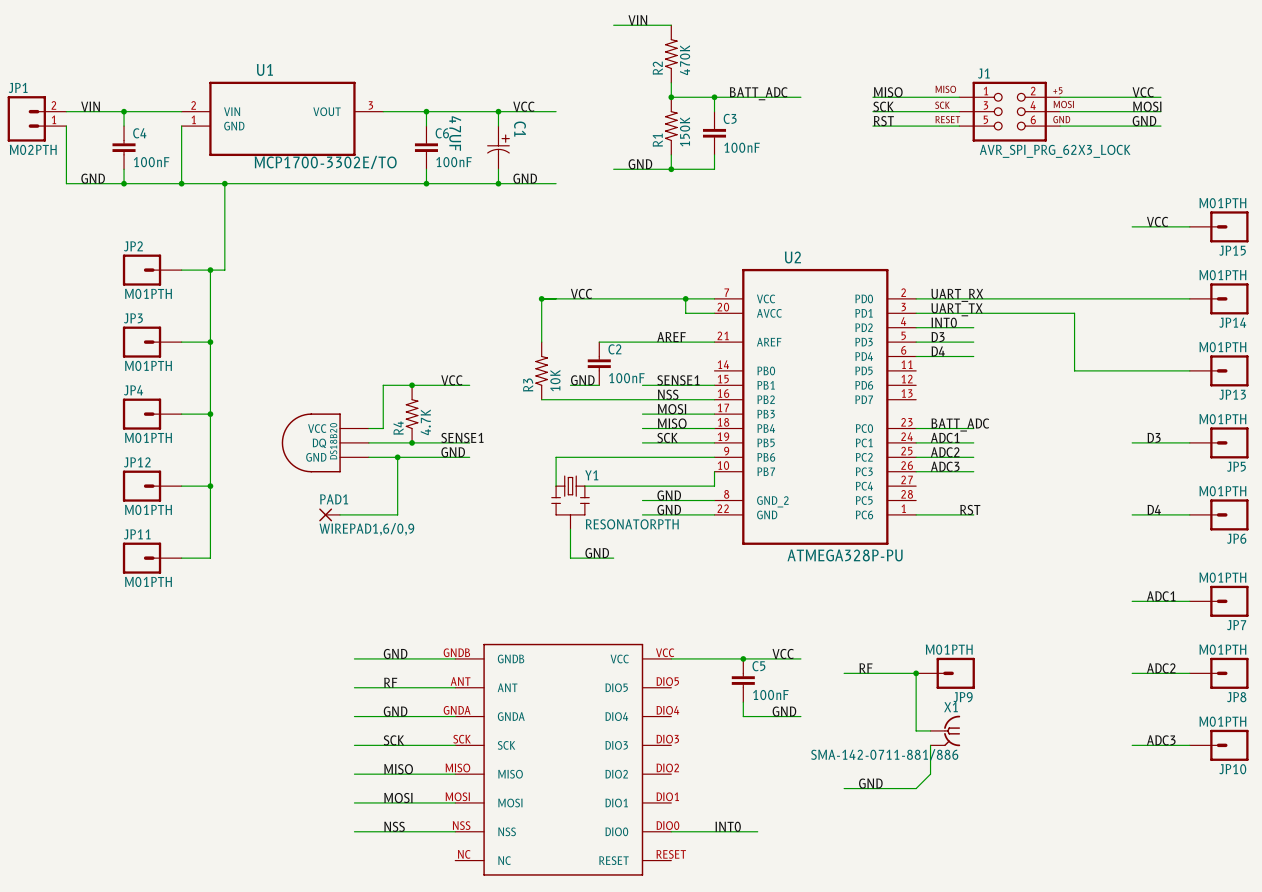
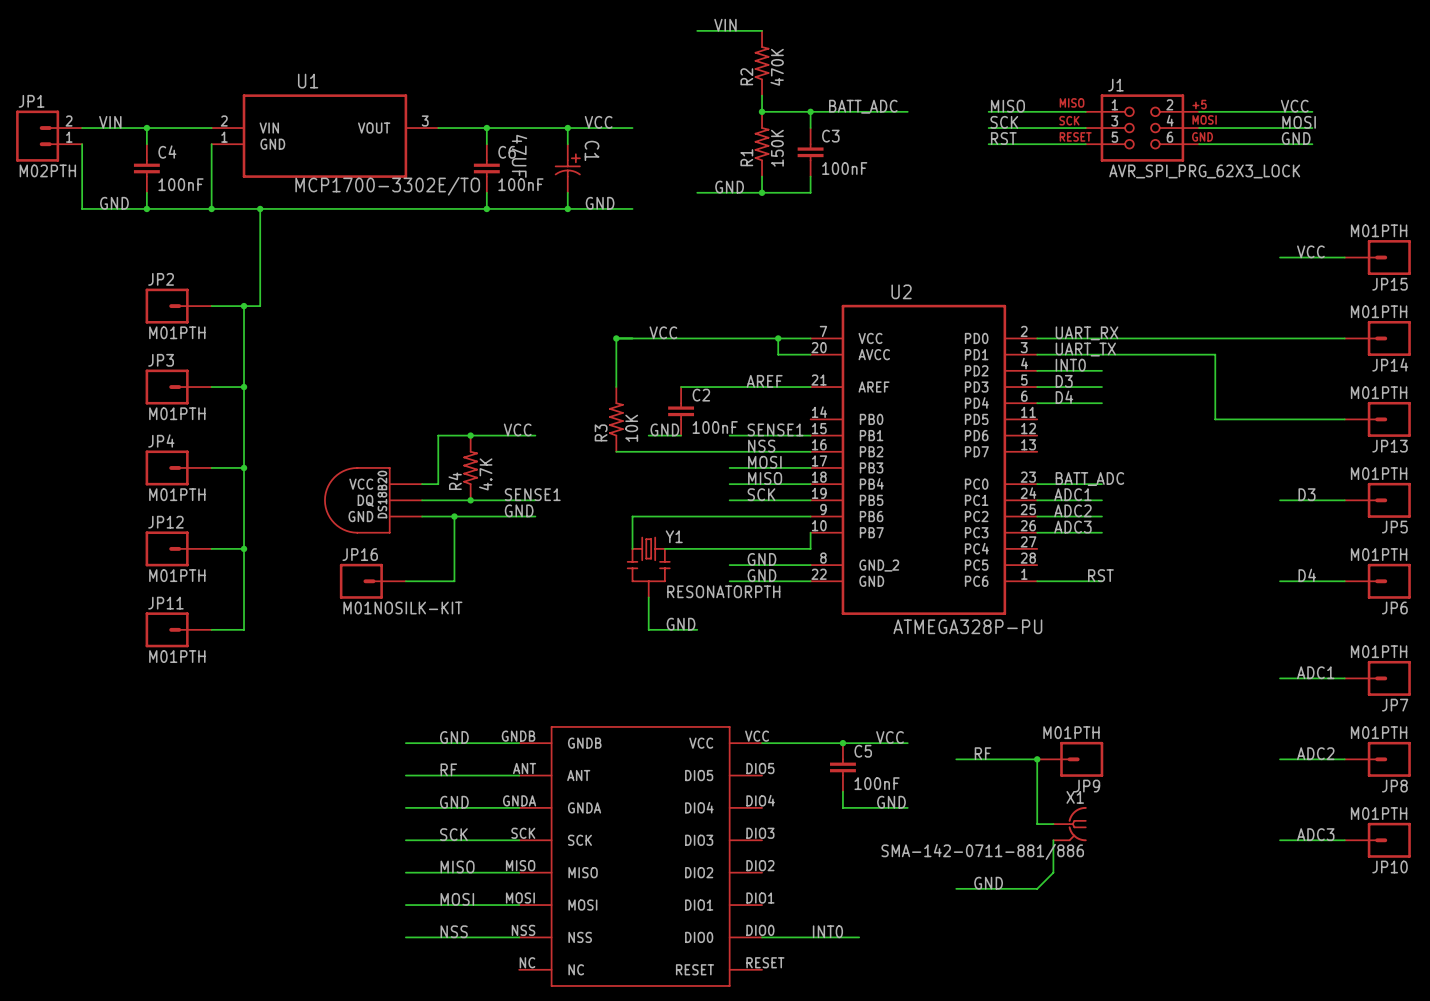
JP16: none -> M01NOSILK-KIT (372, 581)
PAD1: WIREPAD1,6/0,9 (329, 514) -> none

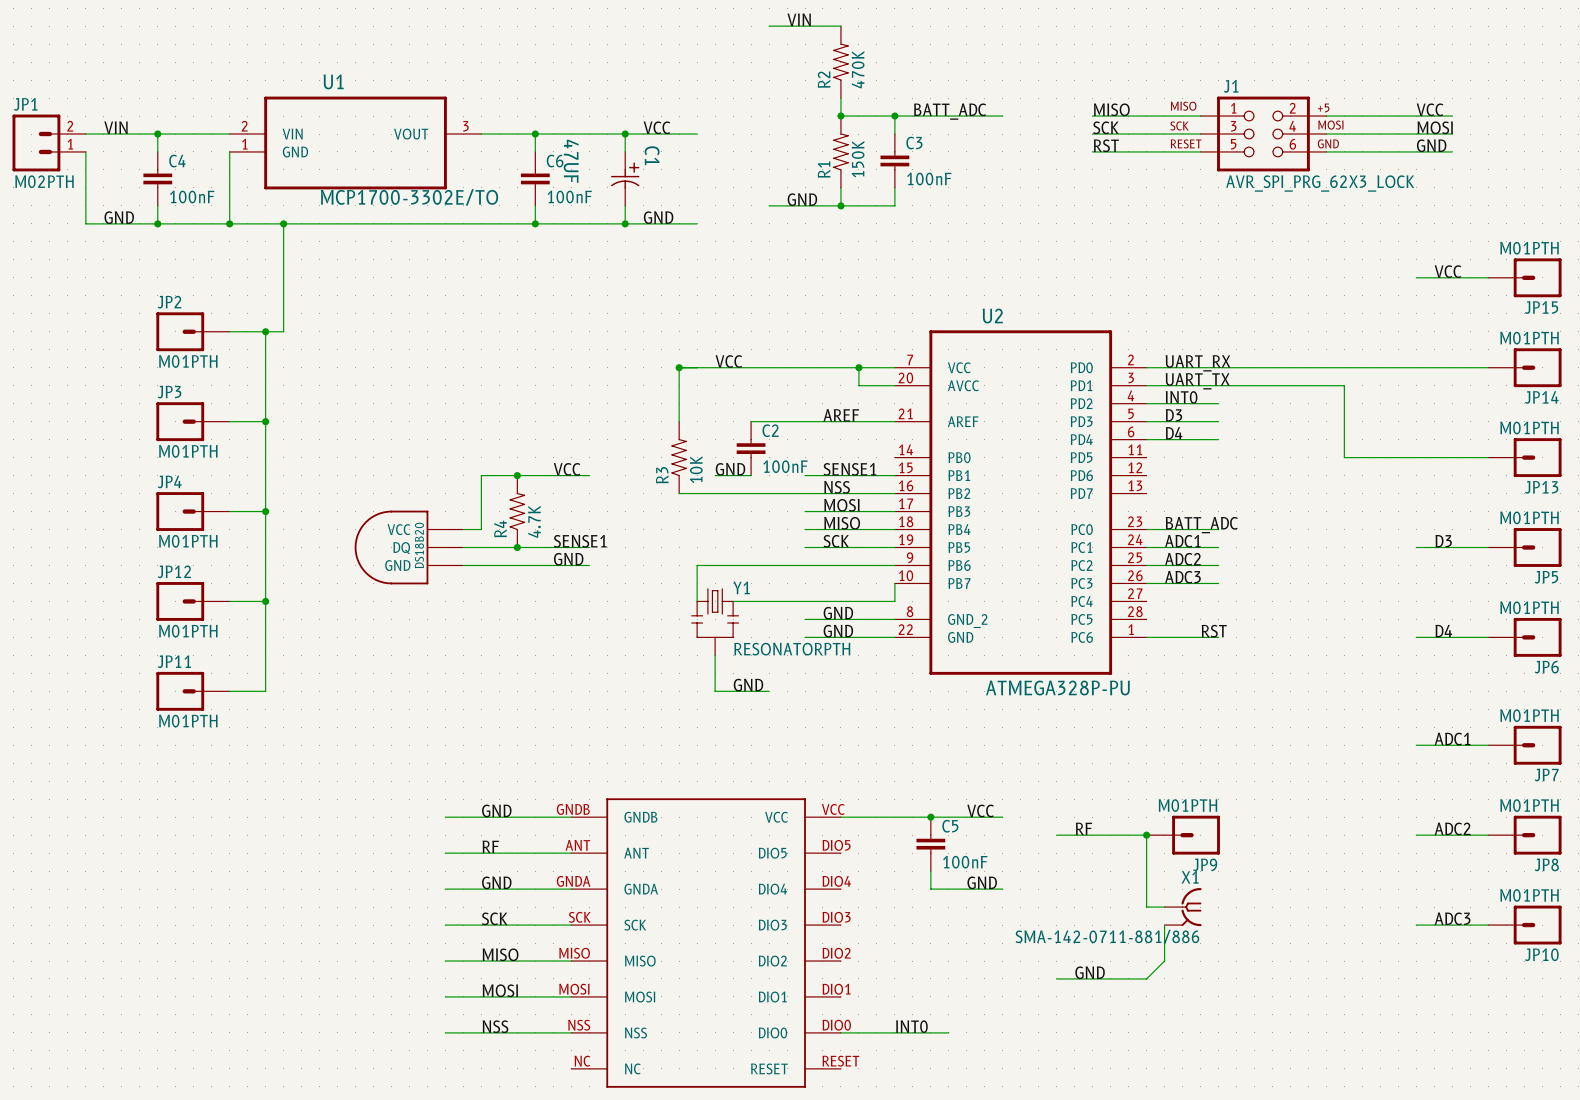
wire: (454, 516) (454, 581) (405, 581) -> none
junction: (454, 516) -> none
JP16: M01NOSILK-KIT (372, 581) -> none

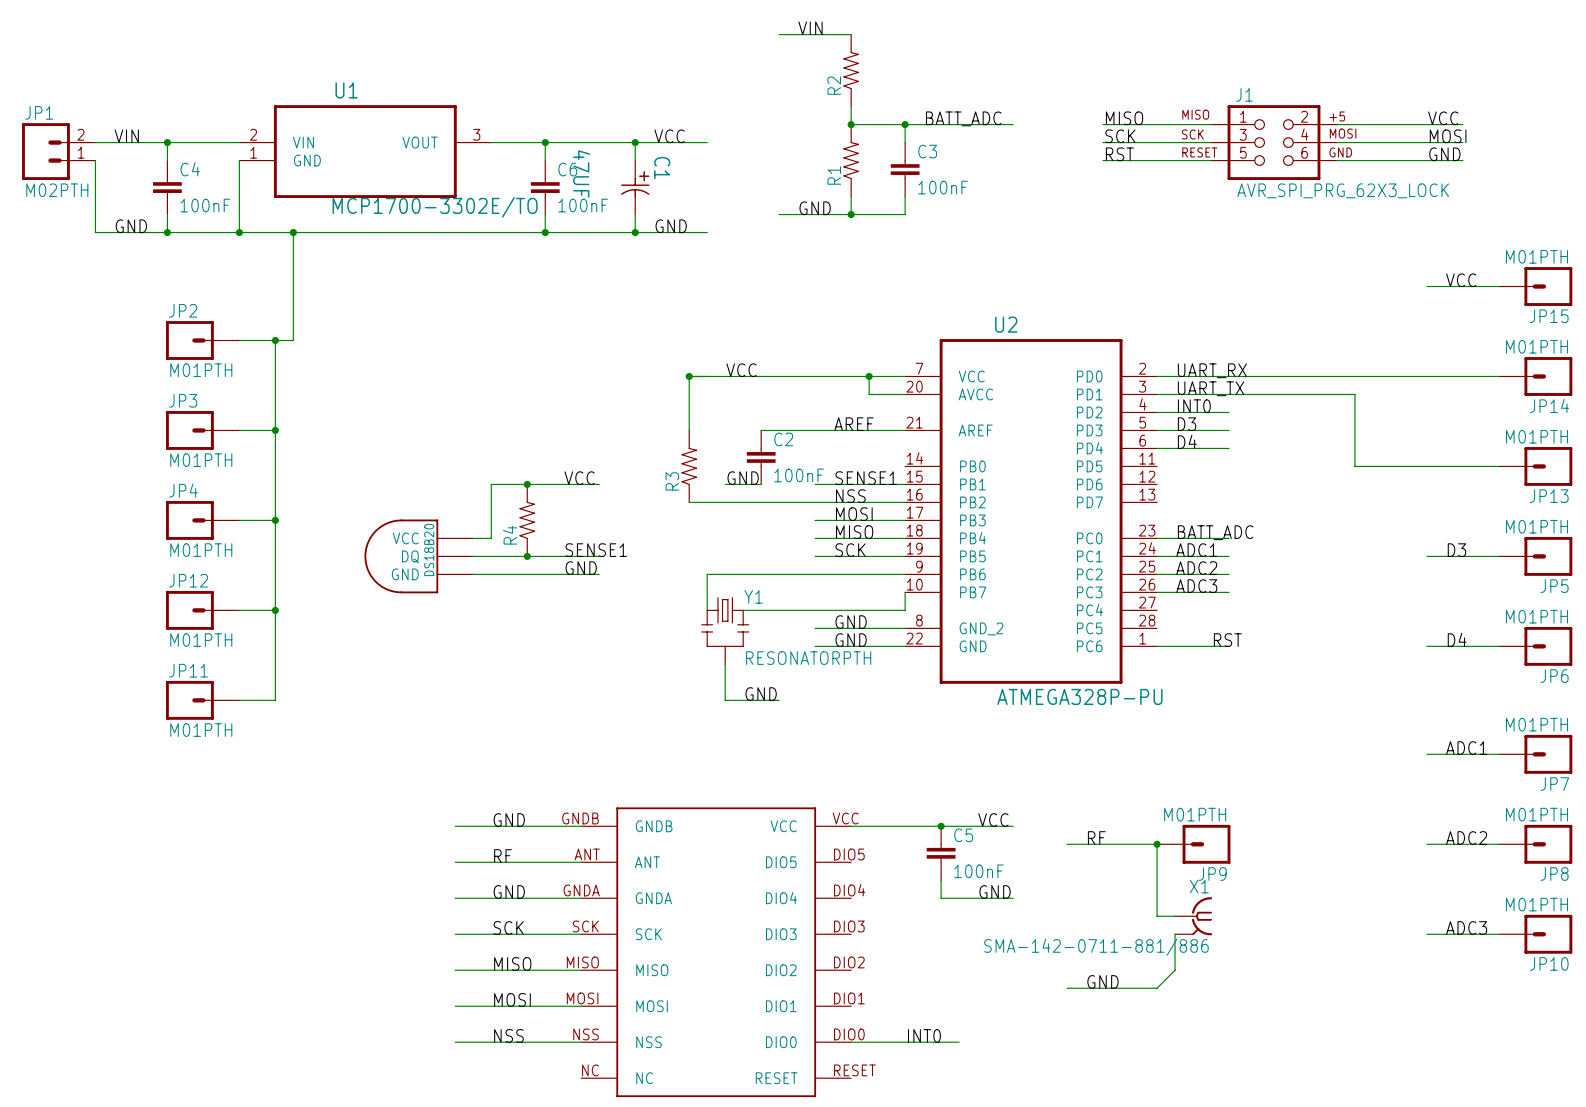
R2 value: 470K (858, 69) -> none
R1 value: 150K (858, 159) -> none
R3 value: 10K (696, 469) -> none
R4 value: 4.7K (534, 521) -> none

